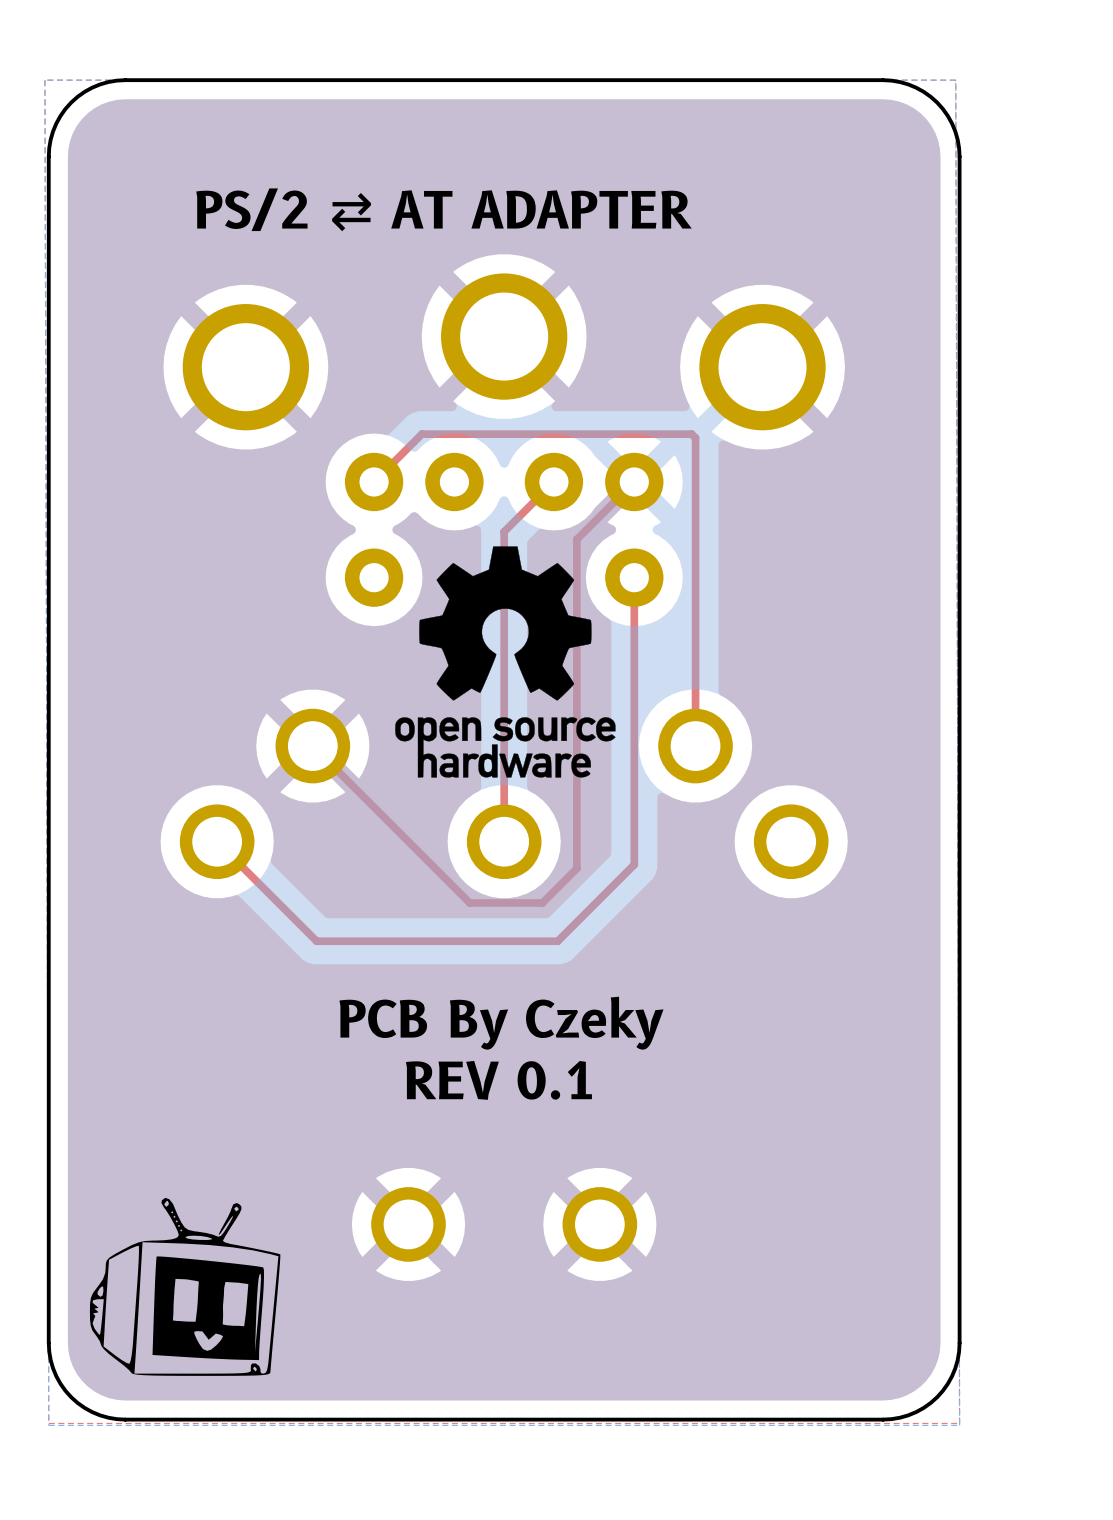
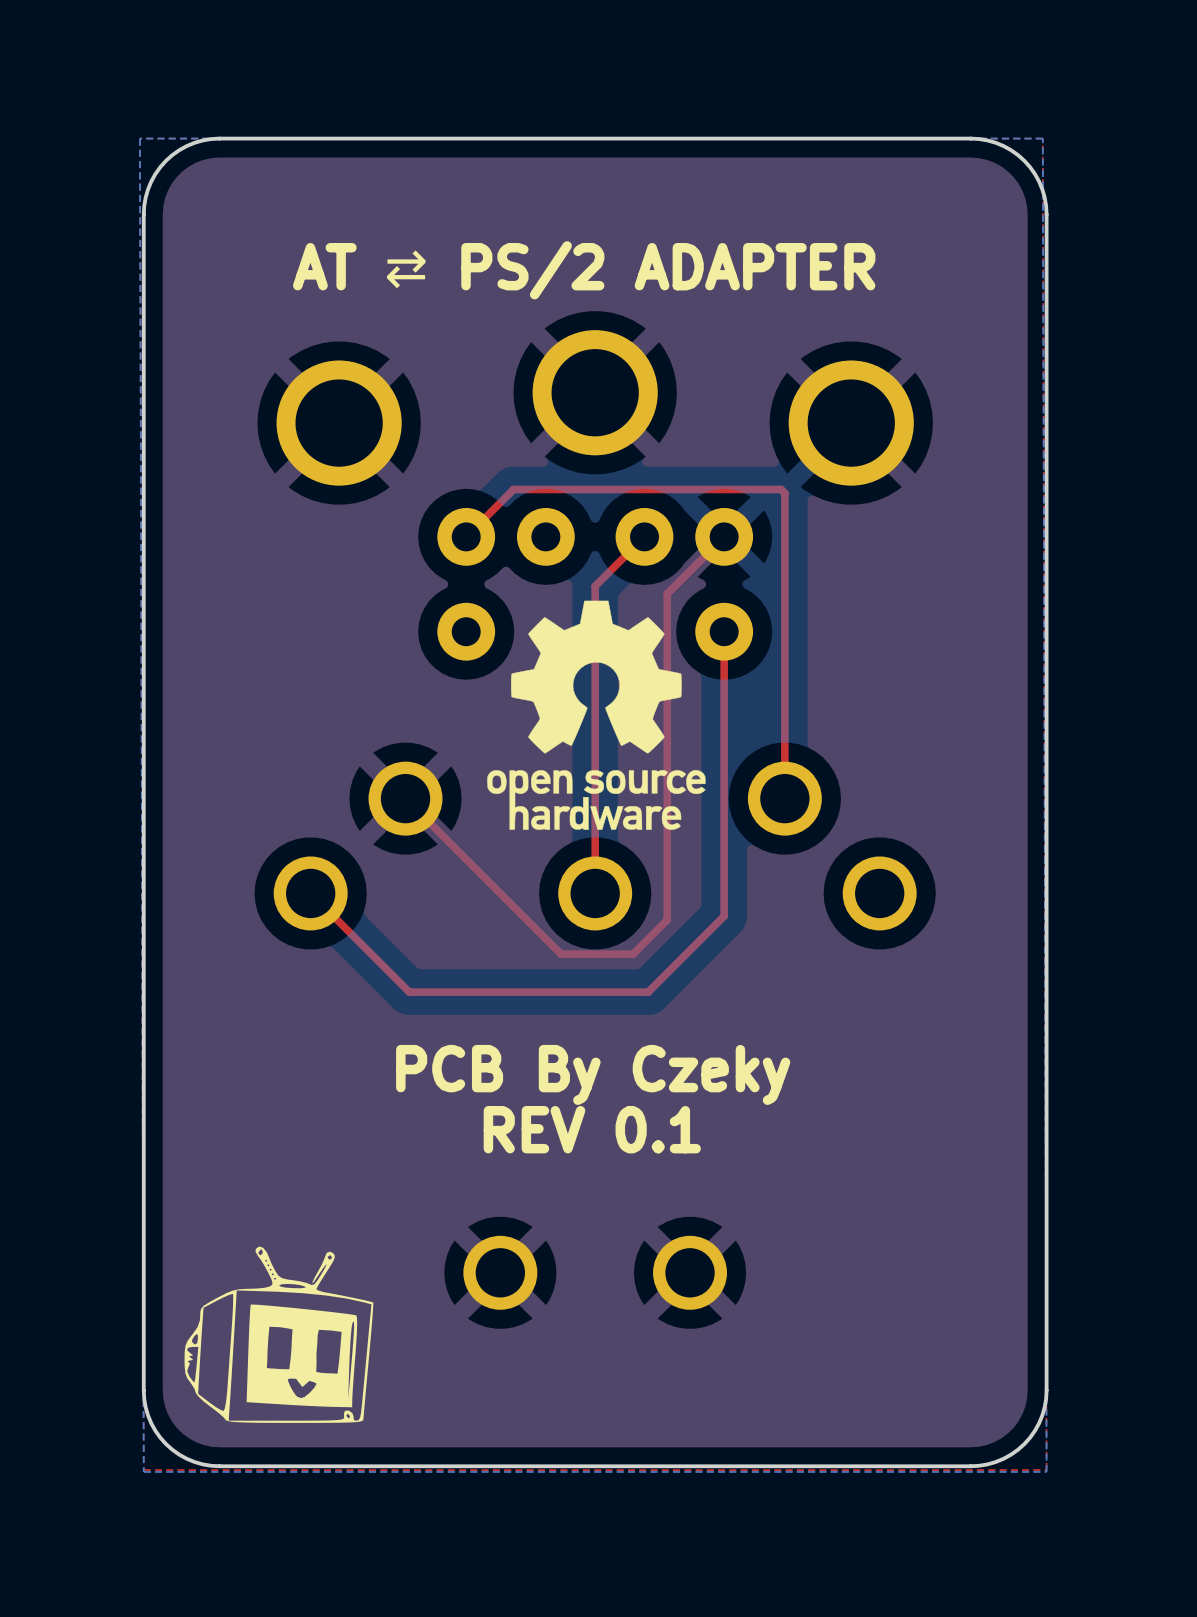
text: PS/2 ⇄ AT ADAPTER (443, 209) -> AT ⇄ PS/2 ADAPTER (584, 270)

